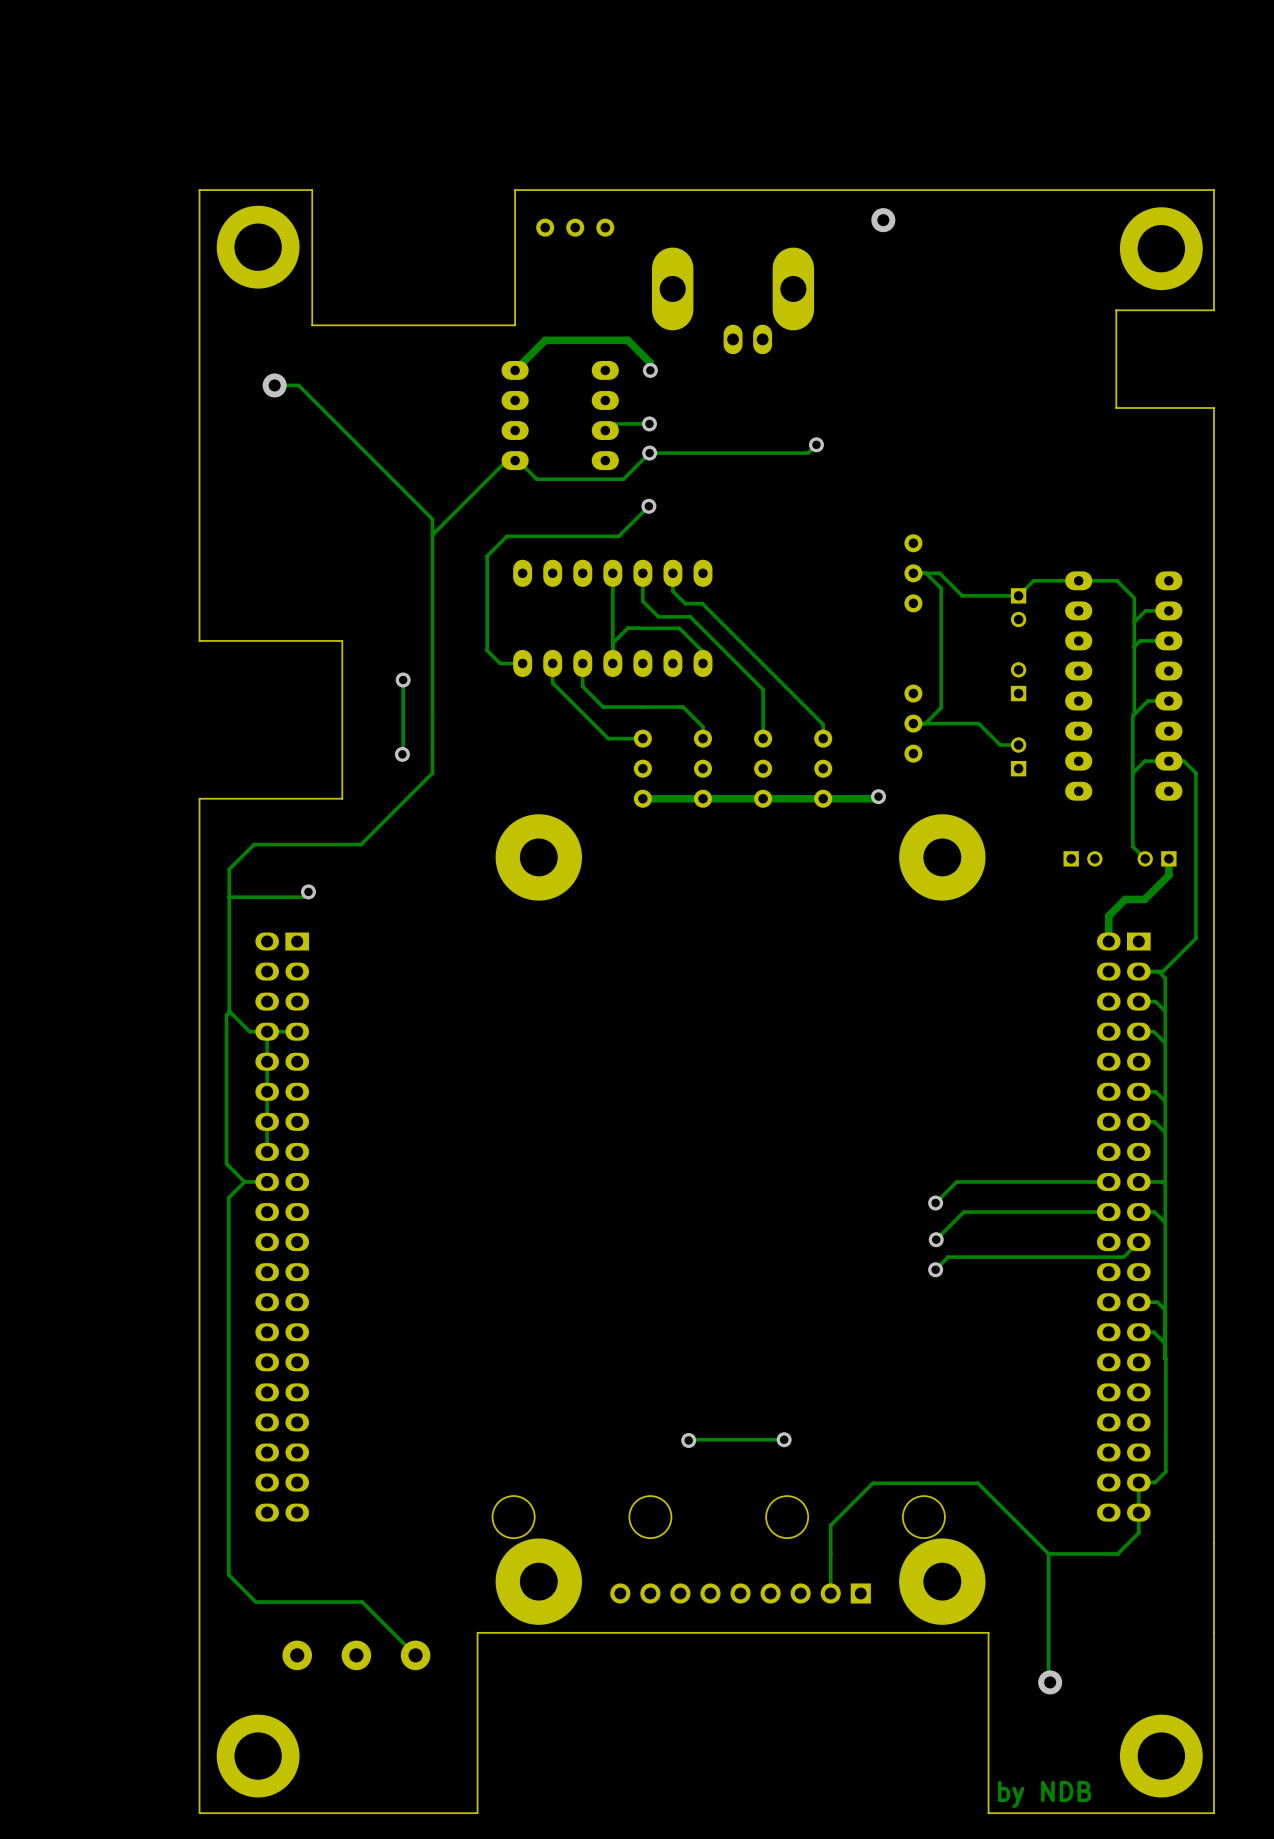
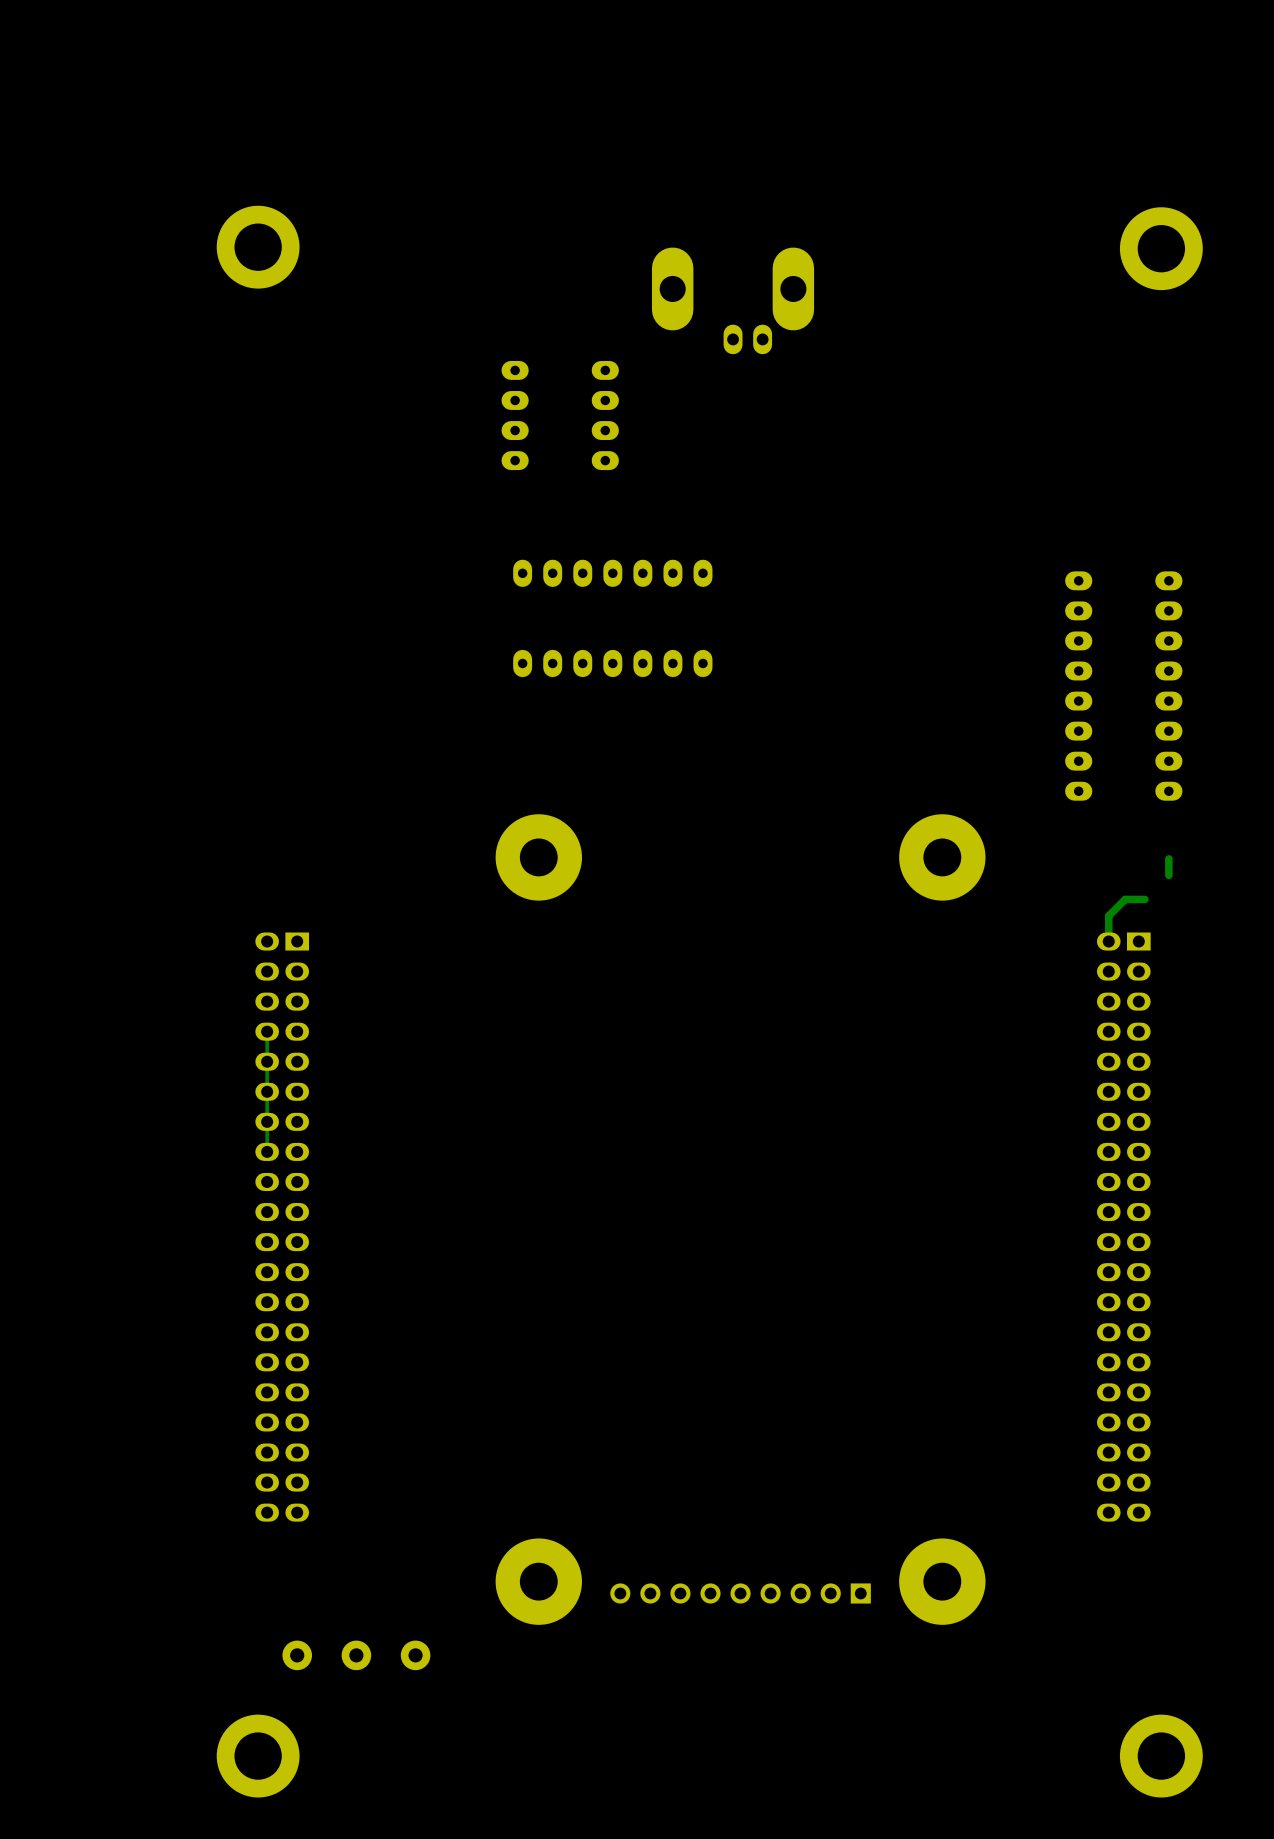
board edge: (1213, 190) (515, 190) (515, 325) (312, 325) (312, 190) (199, 190) (199, 640) (342, 640) (342, 798) (199, 798) (199, 1813) (477, 1813) (477, 1632) (988, 1632) (988, 1813) (1213, 1813) (1213, 407) (1116, 407) (1116, 310) (1213, 310) (1213, 190) -> none
via: (883, 220) -> none
part: (575, 227) -> none
track: (545, 340) (515, 370) -> none
track: (627, 340) (545, 340) -> none
track: (627, 340) (650, 362) -> none
via: (650, 370) -> none
track: (274, 385) (298, 385) (432, 519) (432, 773) (361, 844) (254, 844) (229, 869) (229, 1011) (226, 1015) (226, 1163) (244, 1181) -> none
via: (274, 385) -> none
track: (649, 423) (602, 424) -> none
via: (649, 423) -> none
track: (816, 444) (808, 453) (649, 453) (623, 479) (536, 479) (512, 454) (432, 534) -> none
via: (816, 444) -> none
via: (649, 453) -> none
track: (648, 506) (618, 536) (507, 536) (487, 556) (487, 650) (500, 663) (522, 663) -> none
via: (648, 506) -> none
track: (612, 573) (612, 663) -> none
track: (642, 573) (642, 601) (658, 616) (690, 616) (763, 689) (763, 738) -> none
track: (672, 573) (672, 591) (685, 603) (702, 603) (823, 724) (823, 738) -> none
track: (913, 573) (939, 573) (962, 595) (1018, 595) (1033, 580) (1117, 580) (1134, 598) (1134, 714) -> none
part: (913, 573) -> none
track: (926, 573) (941, 588) (941, 707) (925, 723) -> none
part: (1018, 607) -> none
track: (1168, 610) (1145, 610) (1134, 622) -> none
track: (639, 628) (627, 628) (612, 643) -> none
track: (639, 628) (679, 628) (702, 651) (702, 663) -> none
track: (1168, 640) (1140, 640) (1134, 646) -> none
track: (552, 663) (552, 683) (608, 738) (642, 738) -> none
track: (582, 663) (582, 686) (603, 707) (683, 707) (702, 726) (702, 738) -> none
track: (403, 680) (402, 754) -> none
via: (403, 680) -> none
part: (1018, 681) -> none
track: (1168, 701) (1147, 701) (1132, 716) (1132, 846) (1145, 858) -> none
track: (913, 723) (978, 723) (1000, 745) (1018, 745) -> none
part: (913, 723) -> none
via: (402, 754) -> none
part: (1018, 756) -> none
part: (642, 768) -> none
part: (702, 768) -> none
part: (763, 768) -> none
part: (823, 768) -> none
track: (1132, 773) (1144, 761) (1183, 761) (1195, 773) (1195, 938) (1162, 971) (1138, 971) -> none
track: (878, 796) (876, 798) (642, 798) -> none
via: (878, 796) -> none
part: (1083, 858) -> none
part: (1157, 858) -> none
track: (1168, 875) (1144, 899) (1168, 875) -> none
track: (308, 891) (303, 897) (229, 897) -> none
via: (308, 891) -> none
track: (1158, 971) (1165, 978) (1165, 1471) (1155, 1482) (1138, 1482) (1138, 1532) (1117, 1553) (1048, 1553) -> none
track: (1138, 1001) (1155, 1001) (1165, 1011) -> none
track: (229, 1011) (249, 1031) (297, 1031) -> none
track: (1138, 1031) (1153, 1031) (1165, 1043) -> none
track: (1138, 1091) (1155, 1091) (1165, 1101) -> none
track: (1138, 1121) (1154, 1121) (1165, 1132) -> none
track: (244, 1181) (228, 1197) (228, 1574) (255, 1602) (362, 1602) (415, 1655) -> none
track: (267, 1181) (244, 1181) -> none
track: (1108, 1181) (956, 1181) (935, 1203) -> none
track: (1138, 1181) (1162, 1181) (1165, 1184) -> none
via: (935, 1203) -> none
track: (1108, 1212) (963, 1212) (936, 1239) -> none
track: (1138, 1212) (1154, 1212) (1165, 1222) -> none
via: (936, 1239) -> none
track: (1138, 1242) (1123, 1257) (948, 1257) (935, 1269) -> none
via: (935, 1269) -> none
track: (1138, 1302) (1157, 1302) (1165, 1310) -> none
track: (1138, 1332) (1153, 1332) (1165, 1343) -> none
track: (784, 1439) (688, 1440) -> none
via: (784, 1439) -> none
via: (688, 1440) -> none
round board edge: [491, 1495, 536, 1540] -> none
round board edge: [628, 1495, 673, 1540] -> none
round board edge: [765, 1495, 810, 1540] -> none
round board edge: [901, 1495, 946, 1540] -> none
track: (1048, 1553) (1050, 1682) -> none
track: (1048, 1553) (978, 1483) (872, 1483) (830, 1525) (830, 1593) -> none
via: (1050, 1682) -> none
text: by NDB (1044, 1794) -> none

